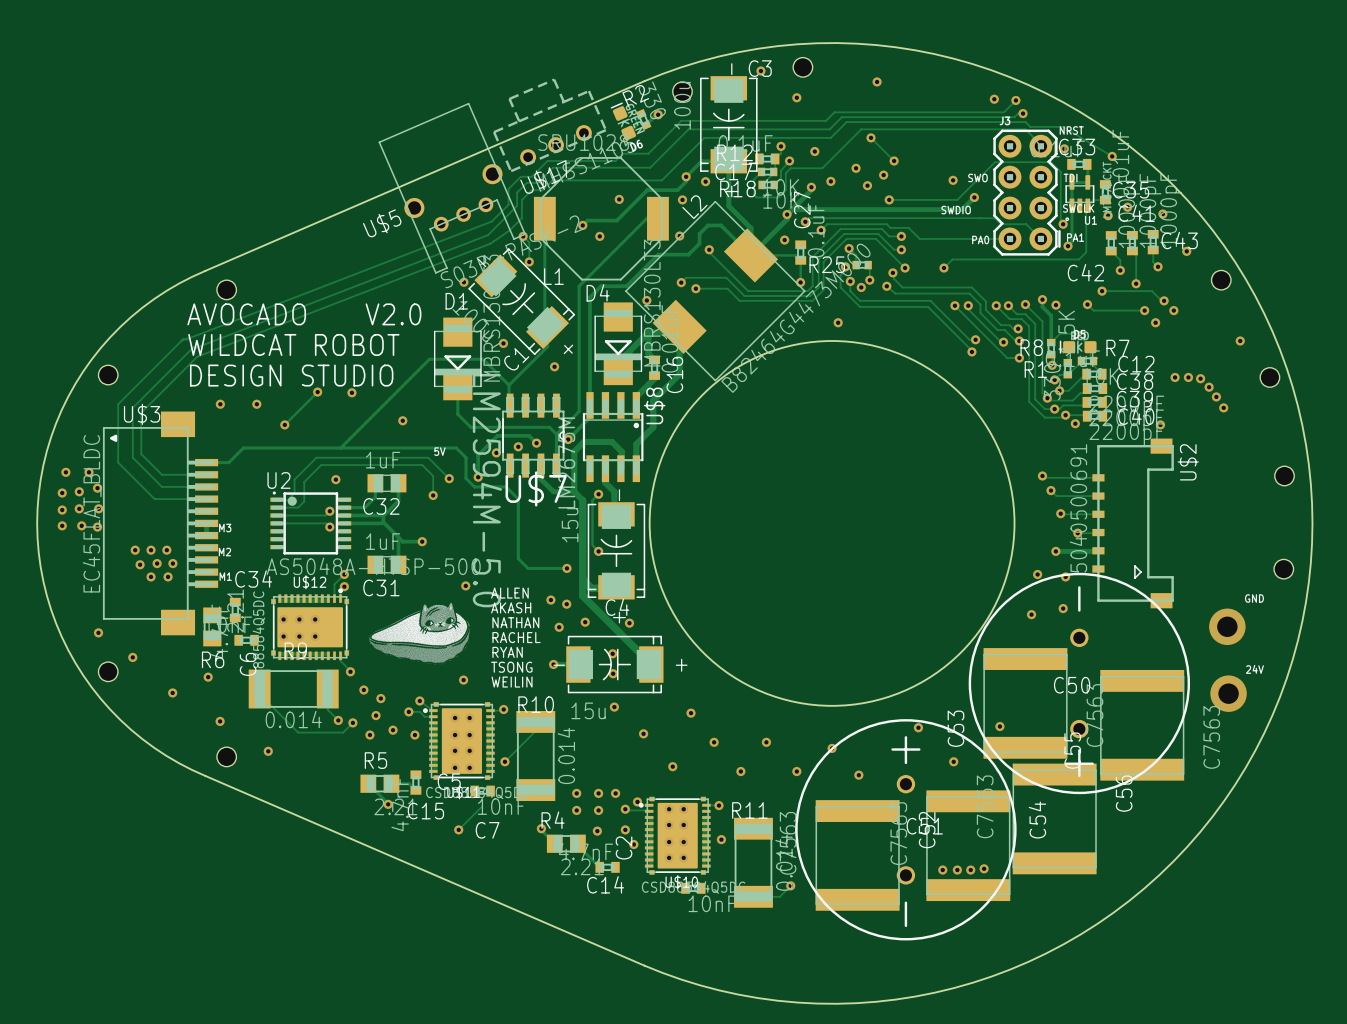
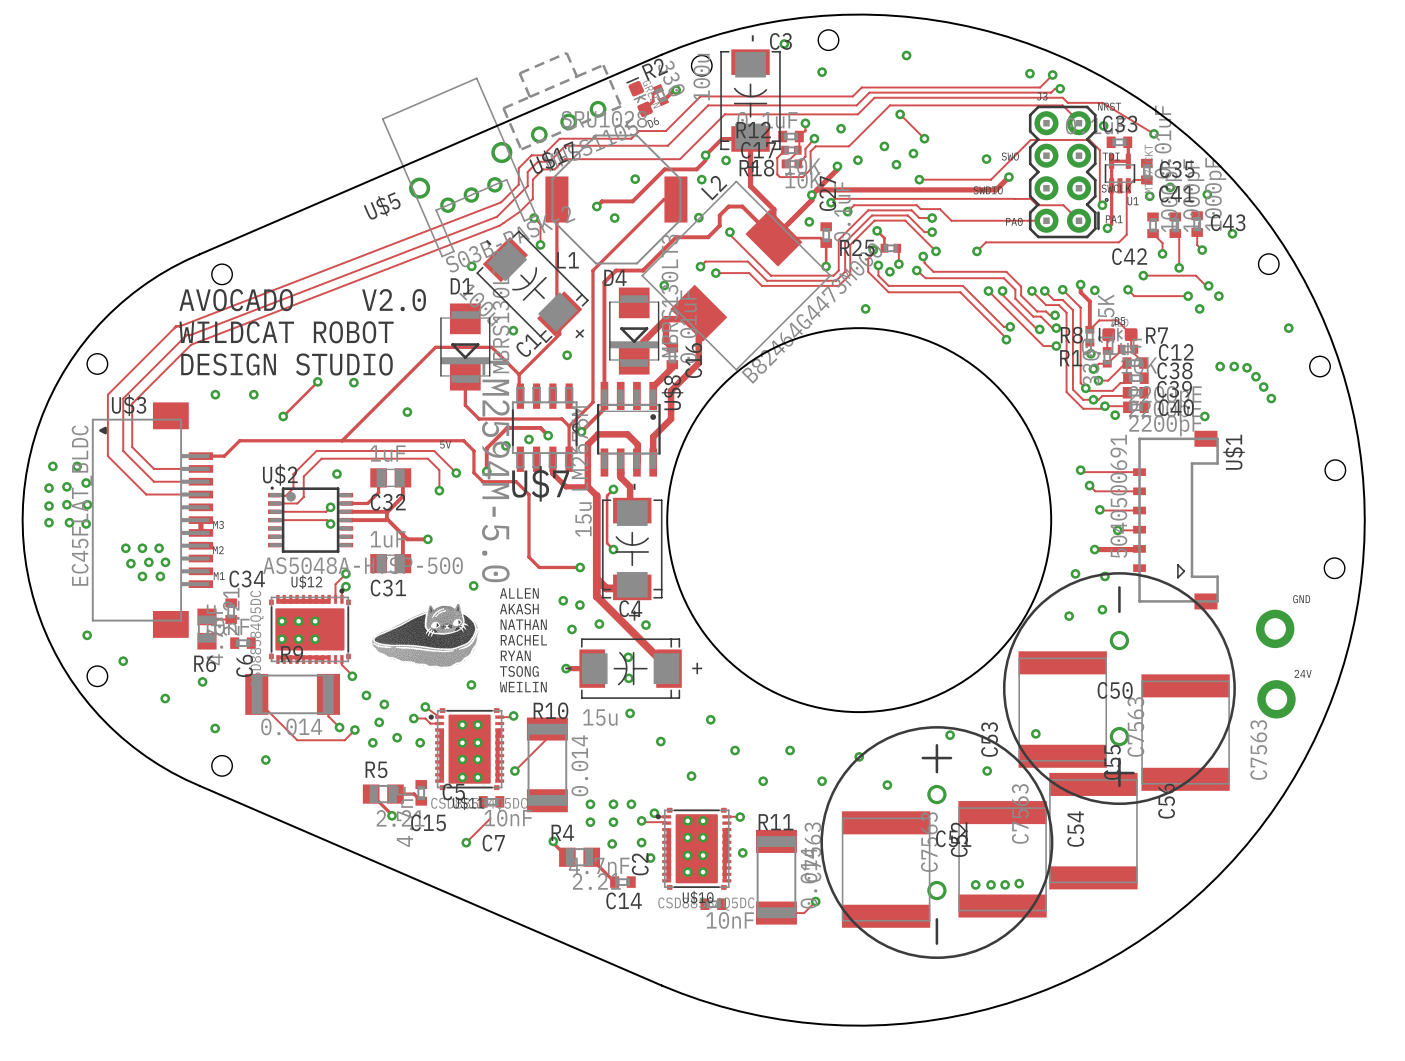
U$2 name: U$2 (1188, 462) -> U$1 (1234, 452)
U2 name: U2 (278, 480) -> U$2 (280, 474)

